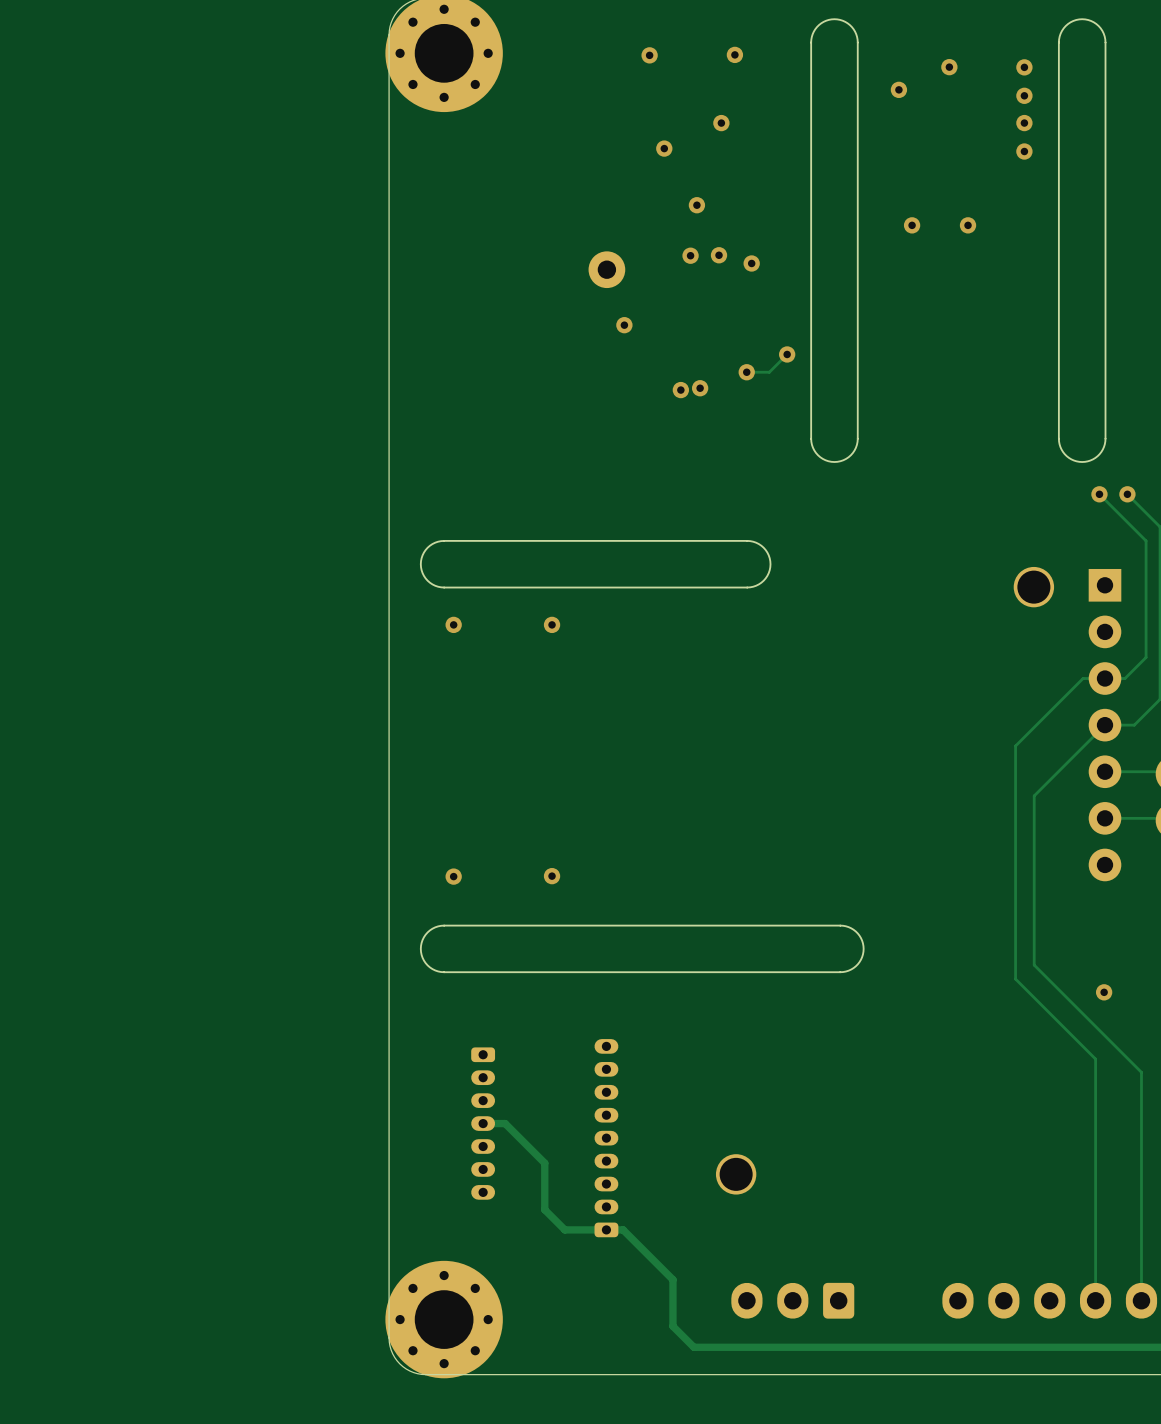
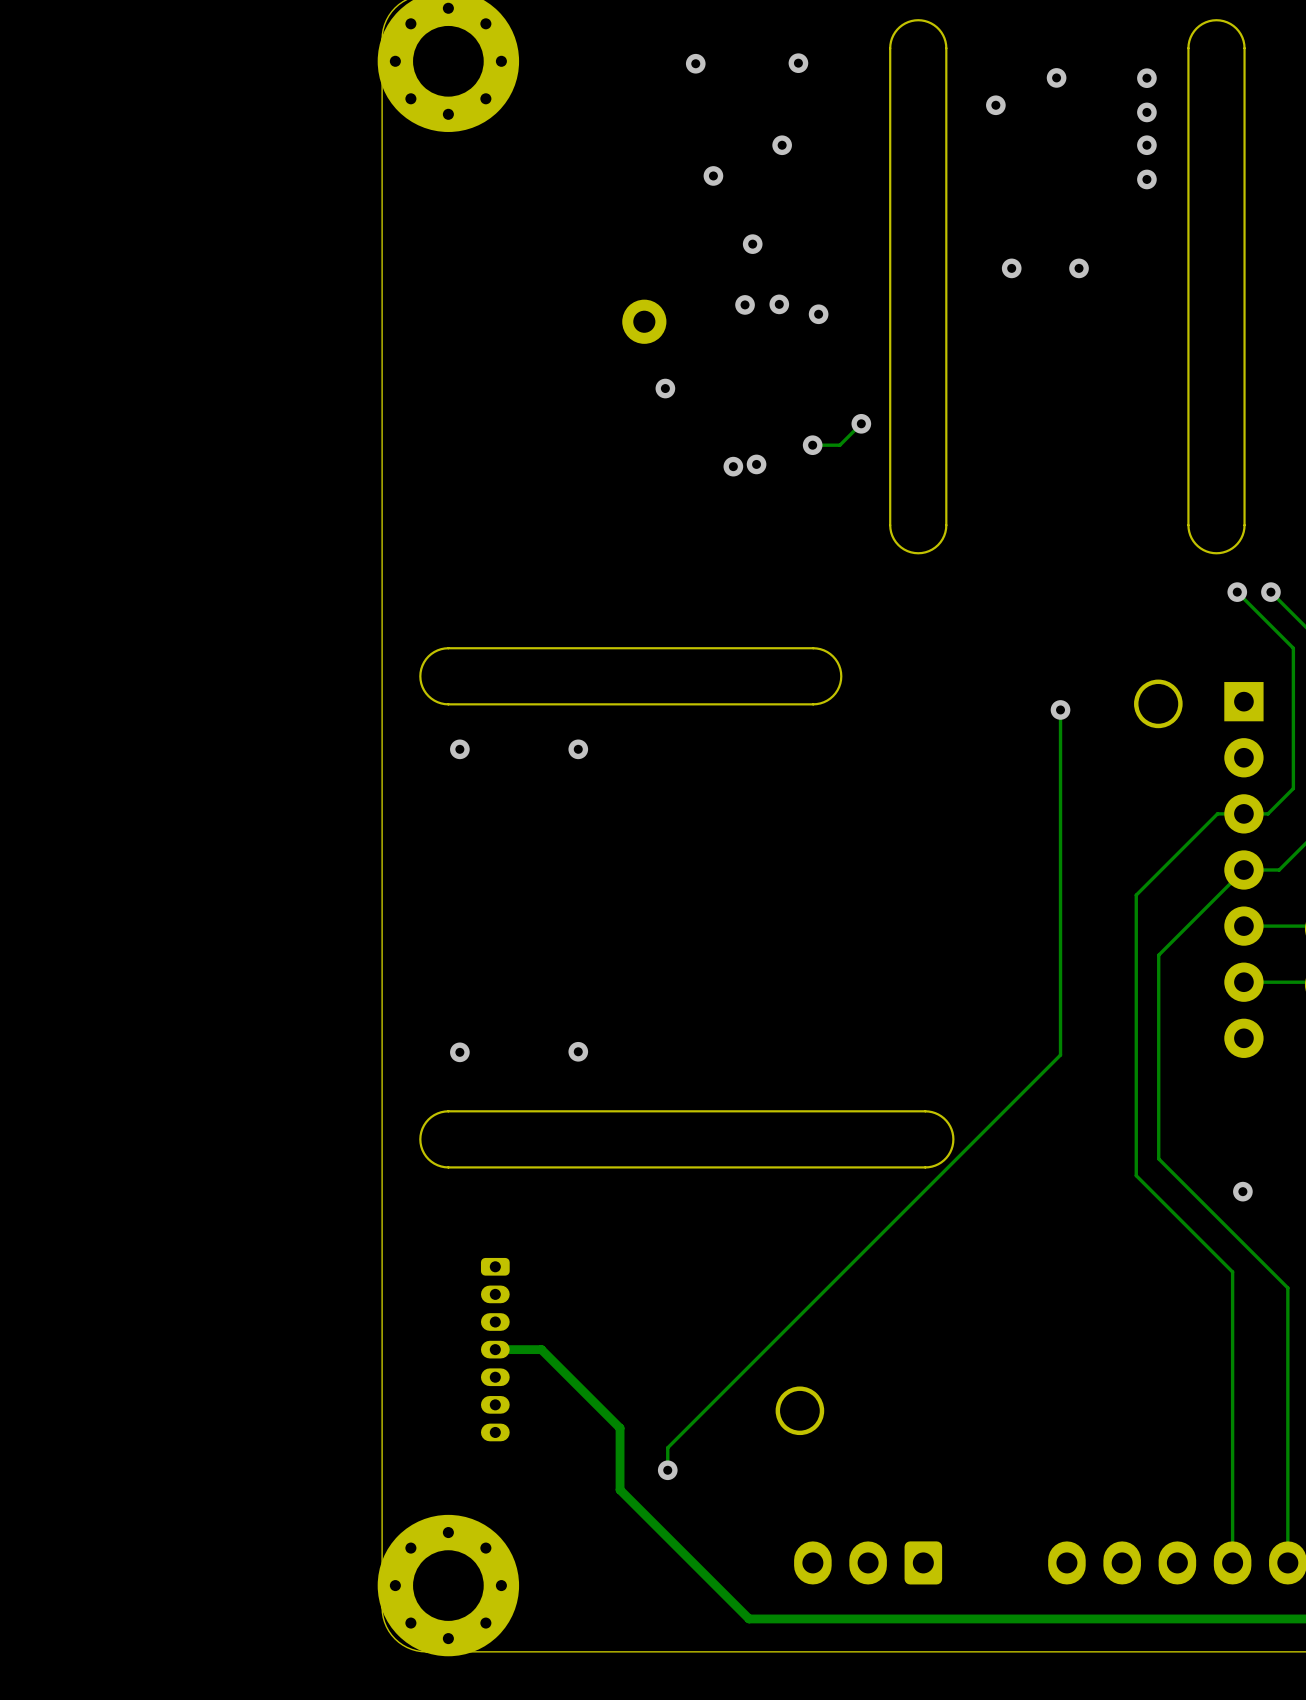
track: none -> (1060, 709) (1060, 1055) (667, 1447) (667, 1470)
via: none -> (1060, 709)
track: (505, 1123) (544, 1163) (544, 1209) (564, 1229) (623, 1229) (672, 1279) (672, 1326) -> (521, 1349) (541, 1349) (620, 1428) (620, 1489) (723, 1593)
part: (606, 1138) -> none
via: none -> (667, 1470)

